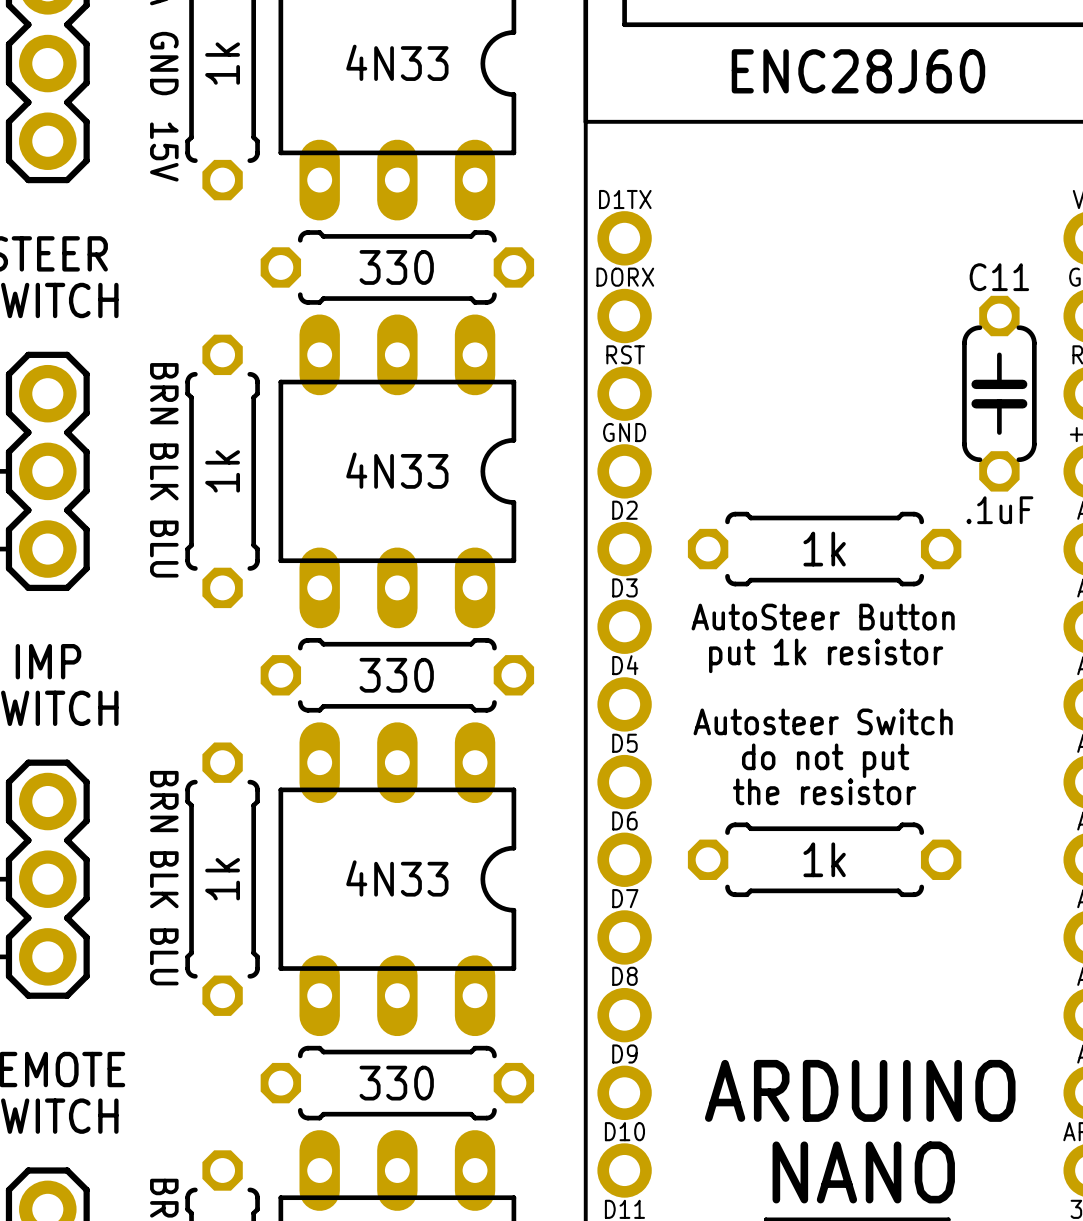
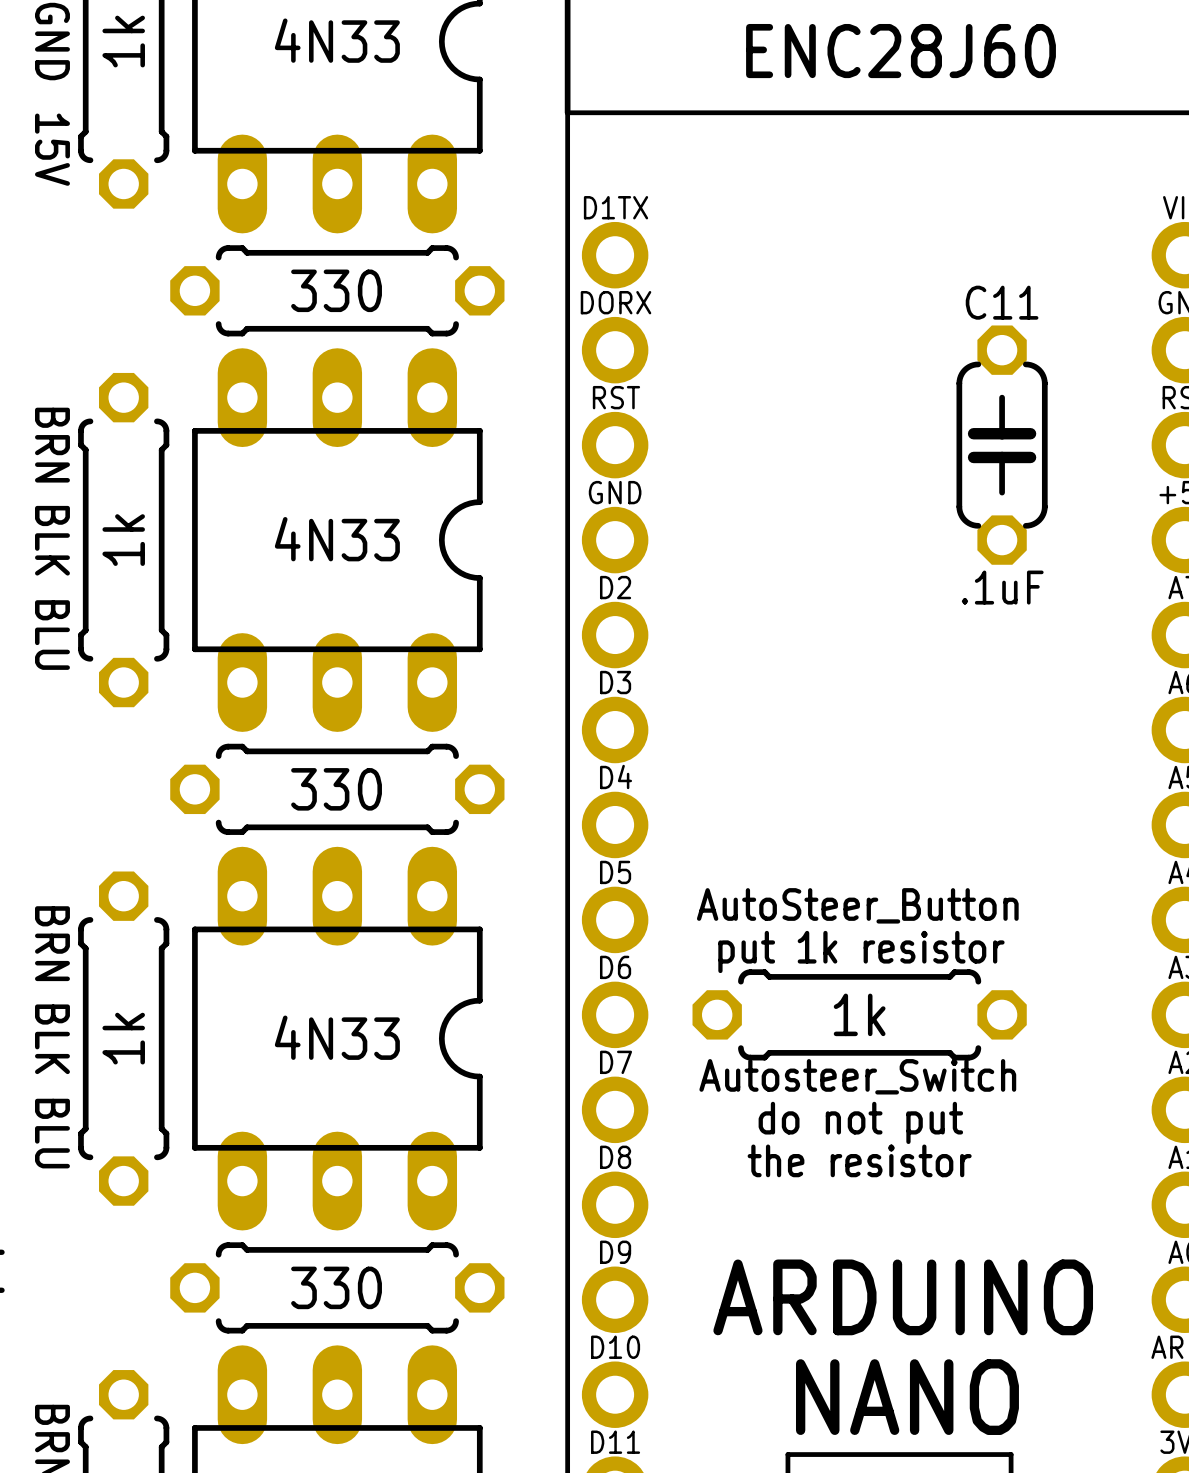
C11 position: (999, 393) -> (1002, 445)
text position: .1uF (999, 510) -> .1uF (1002, 587)
part: 1k (824, 549) -> none
text: AutoSteer Button (823, 617) -> none
text position: put 1k resistor (826, 655) -> put 1k resistor (861, 951)
text: Autosteer Switch (823, 721) -> none
text position: do not put (825, 760) -> do not put (860, 1122)
text: none -> AutoSteer_Button (857, 905)
text position: the resistor (824, 791) -> the resistor (859, 1160)
text: none -> Autosteer_Switch (857, 1076)

